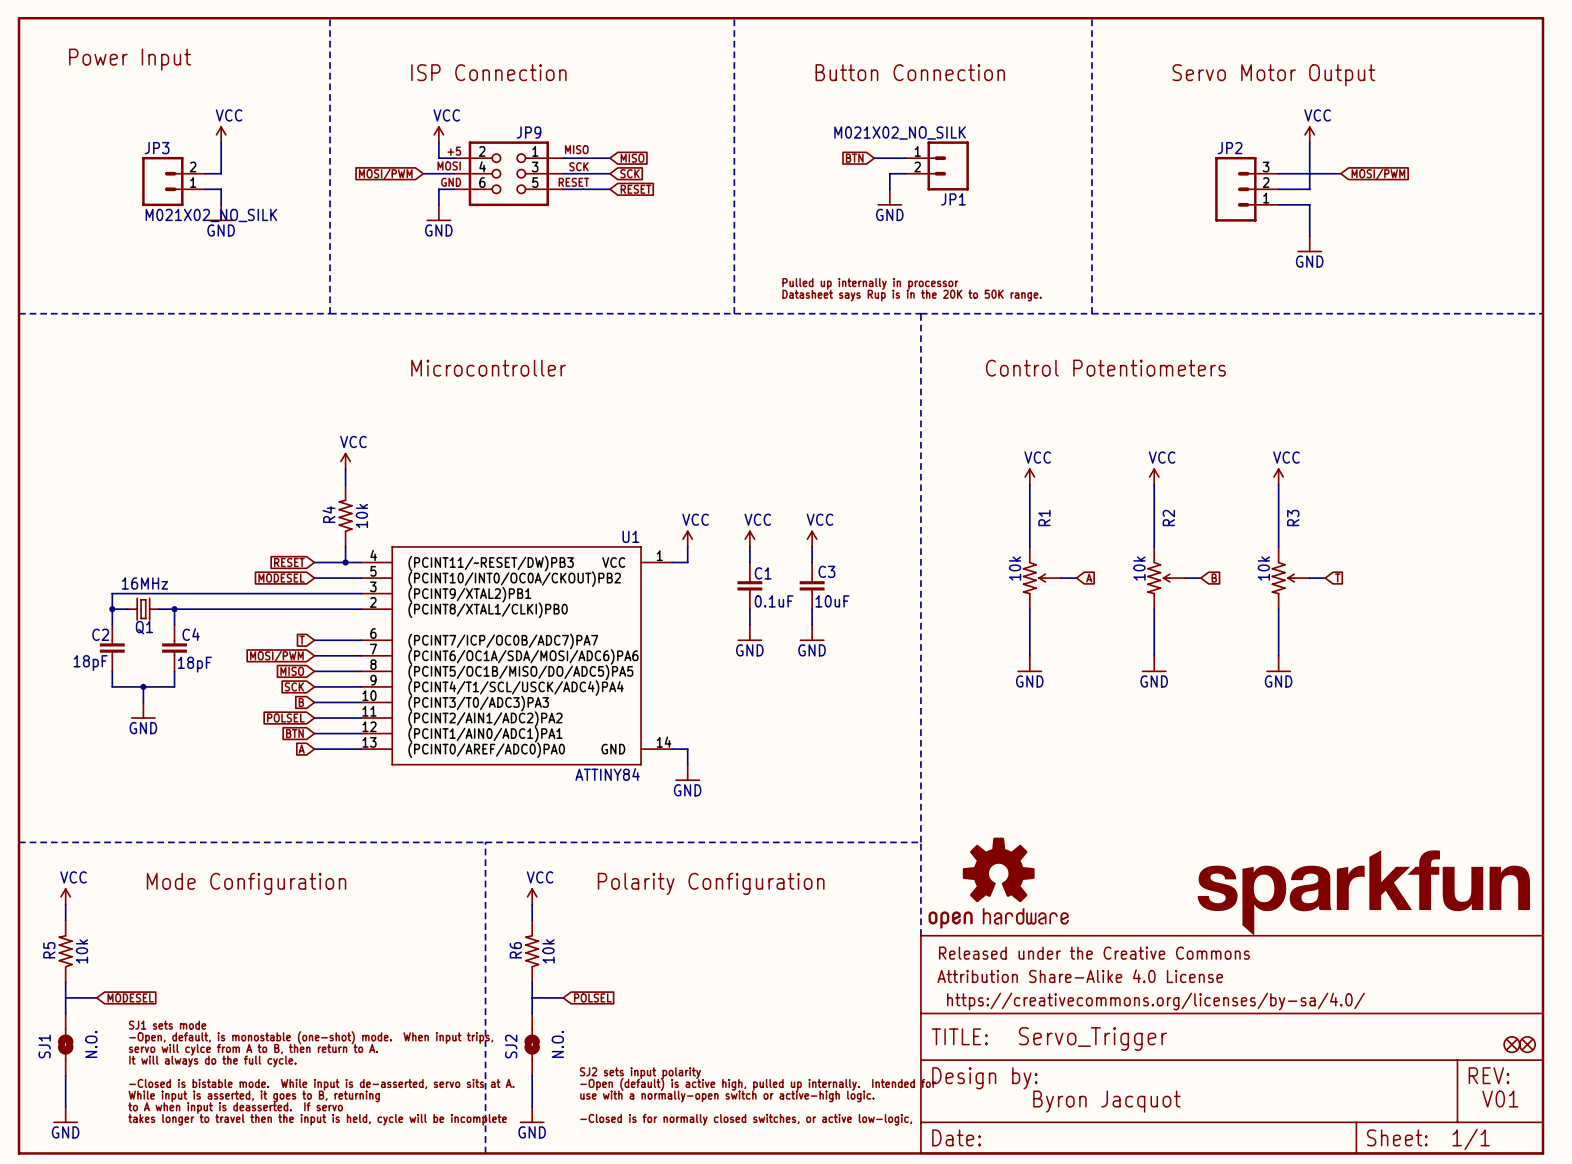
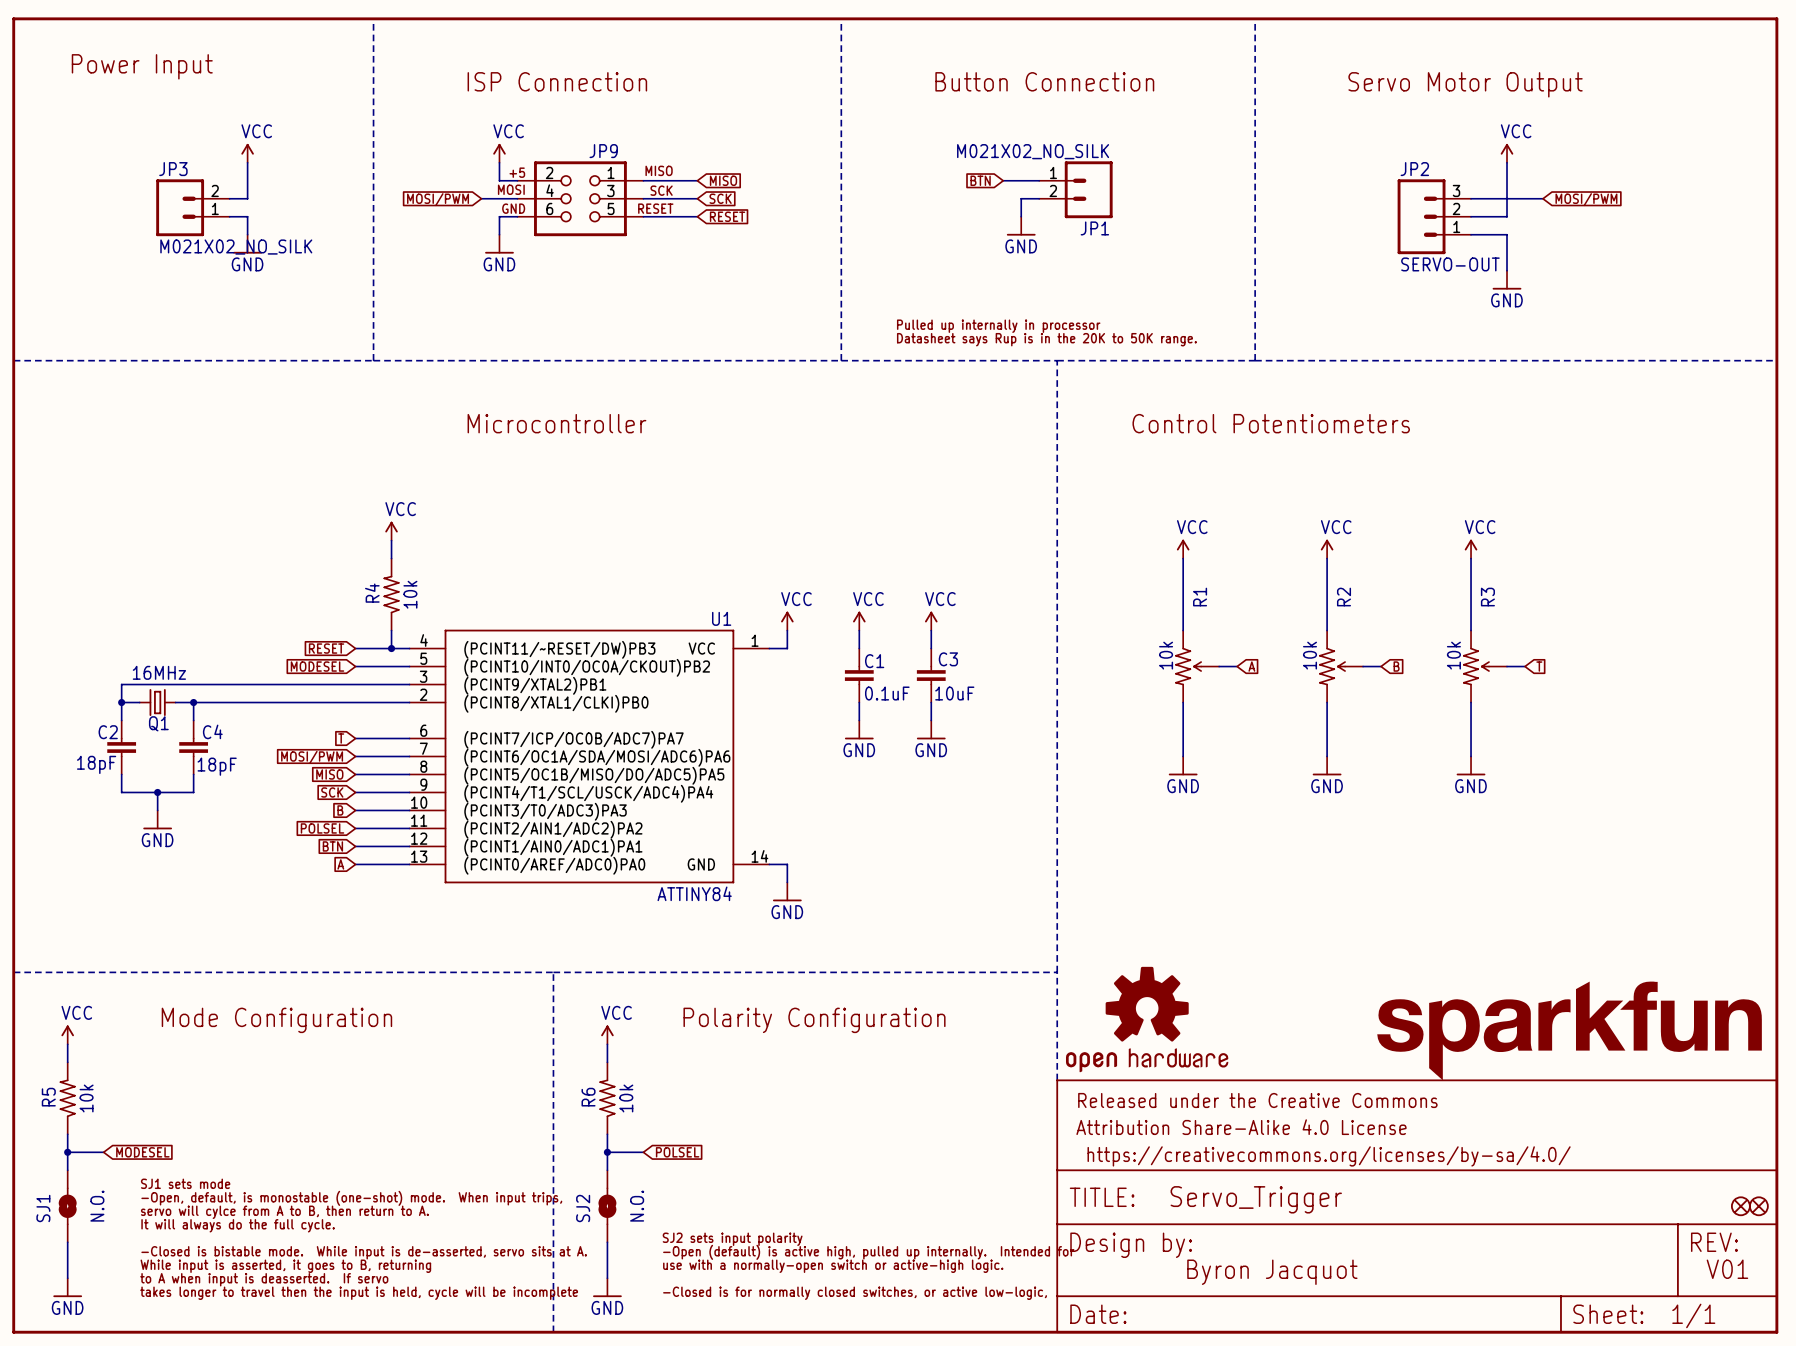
JP2 value: none -> SERVO-OUT (1450, 264)
junction: none -> (67, 1152)
junction: none -> (607, 1152)

